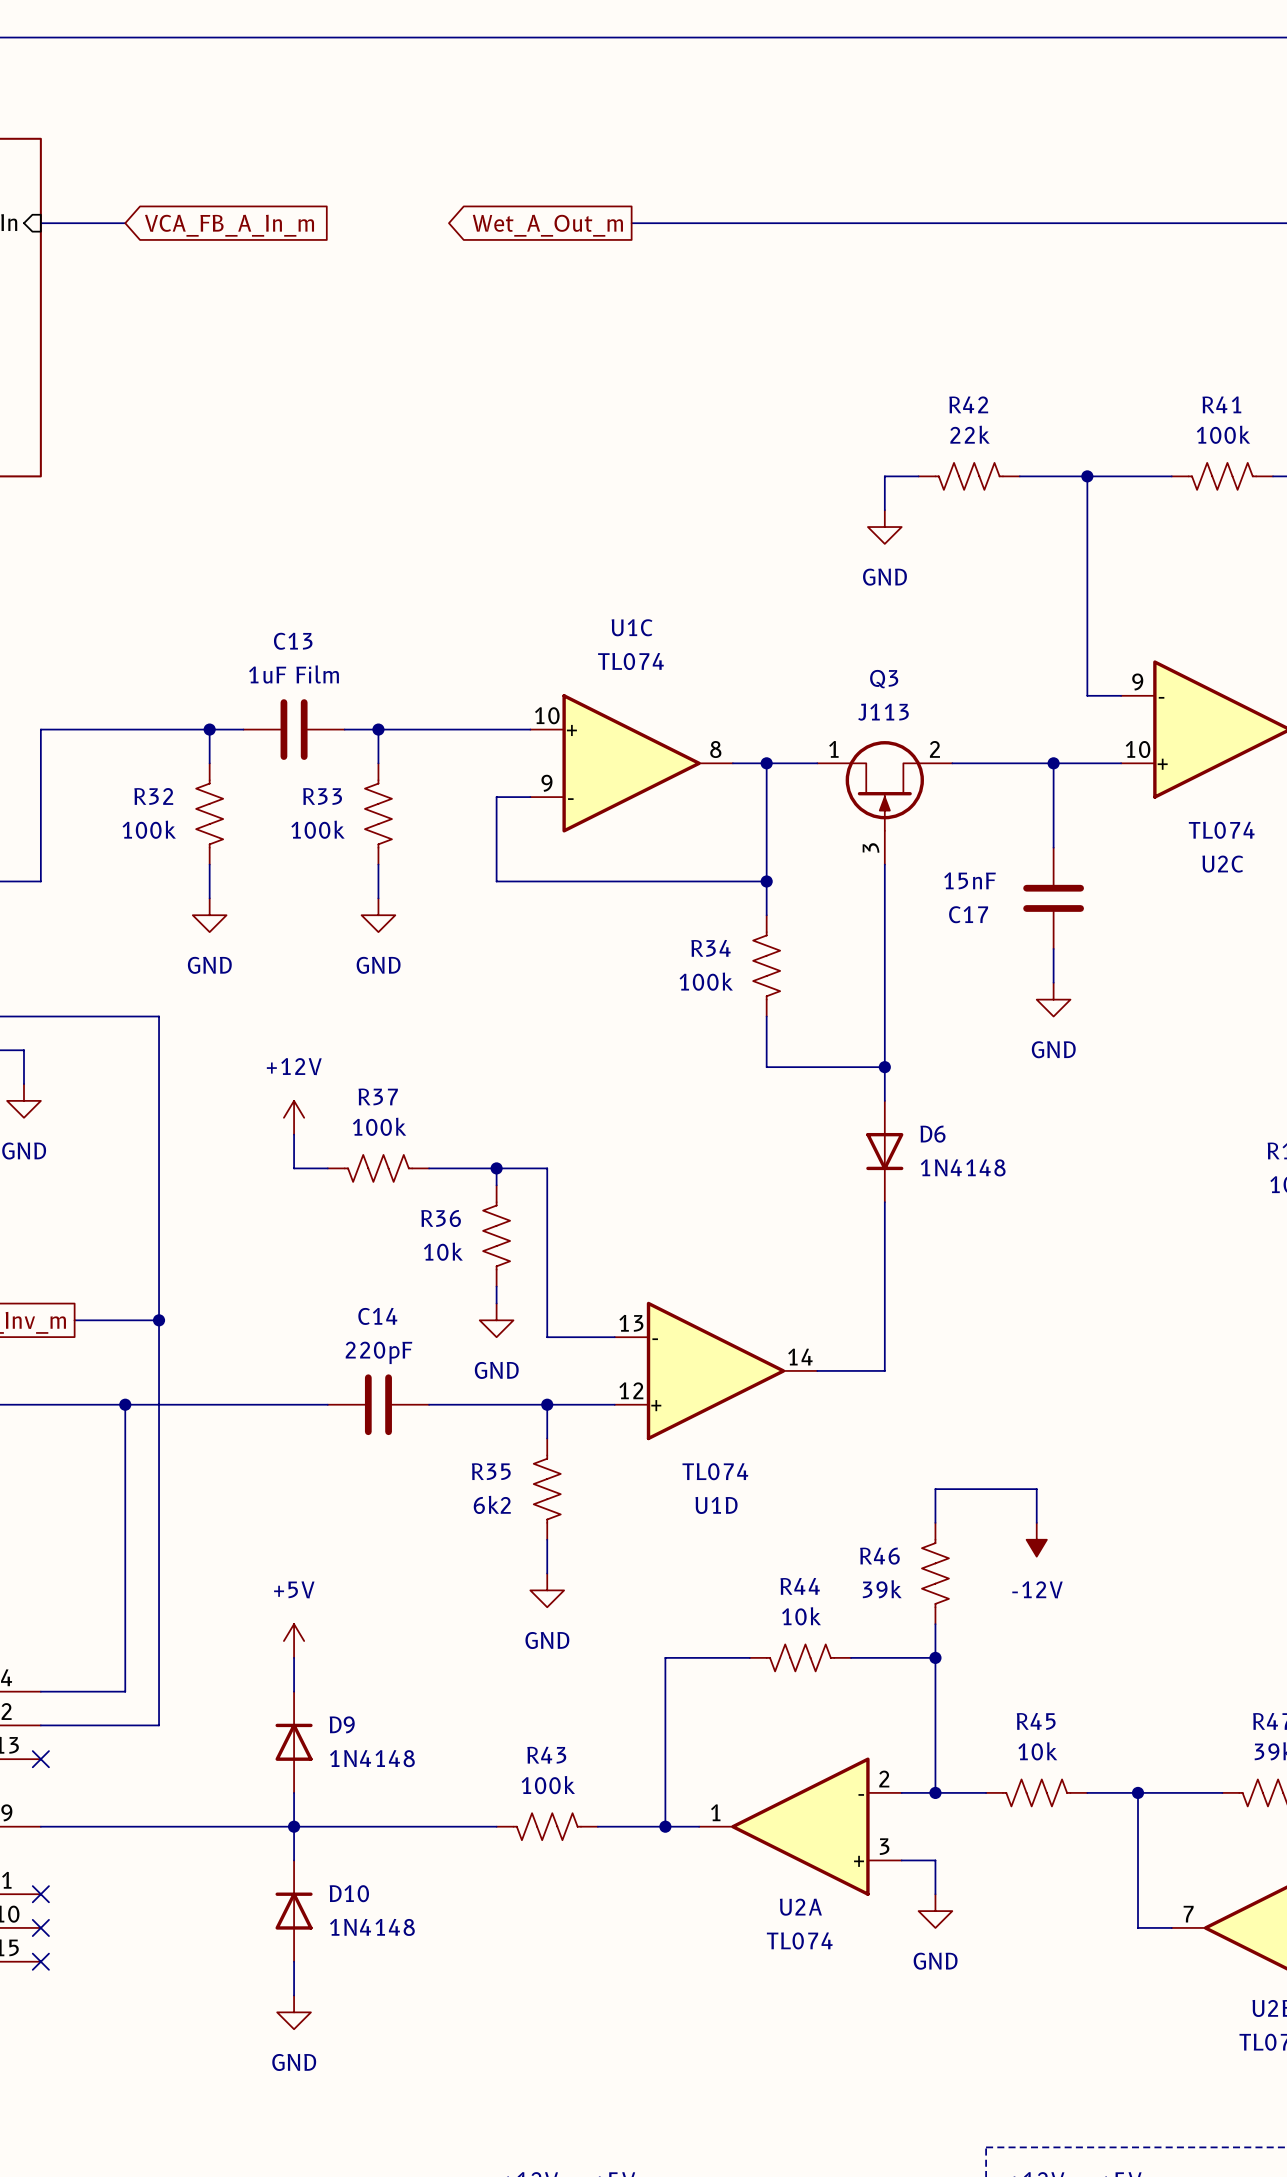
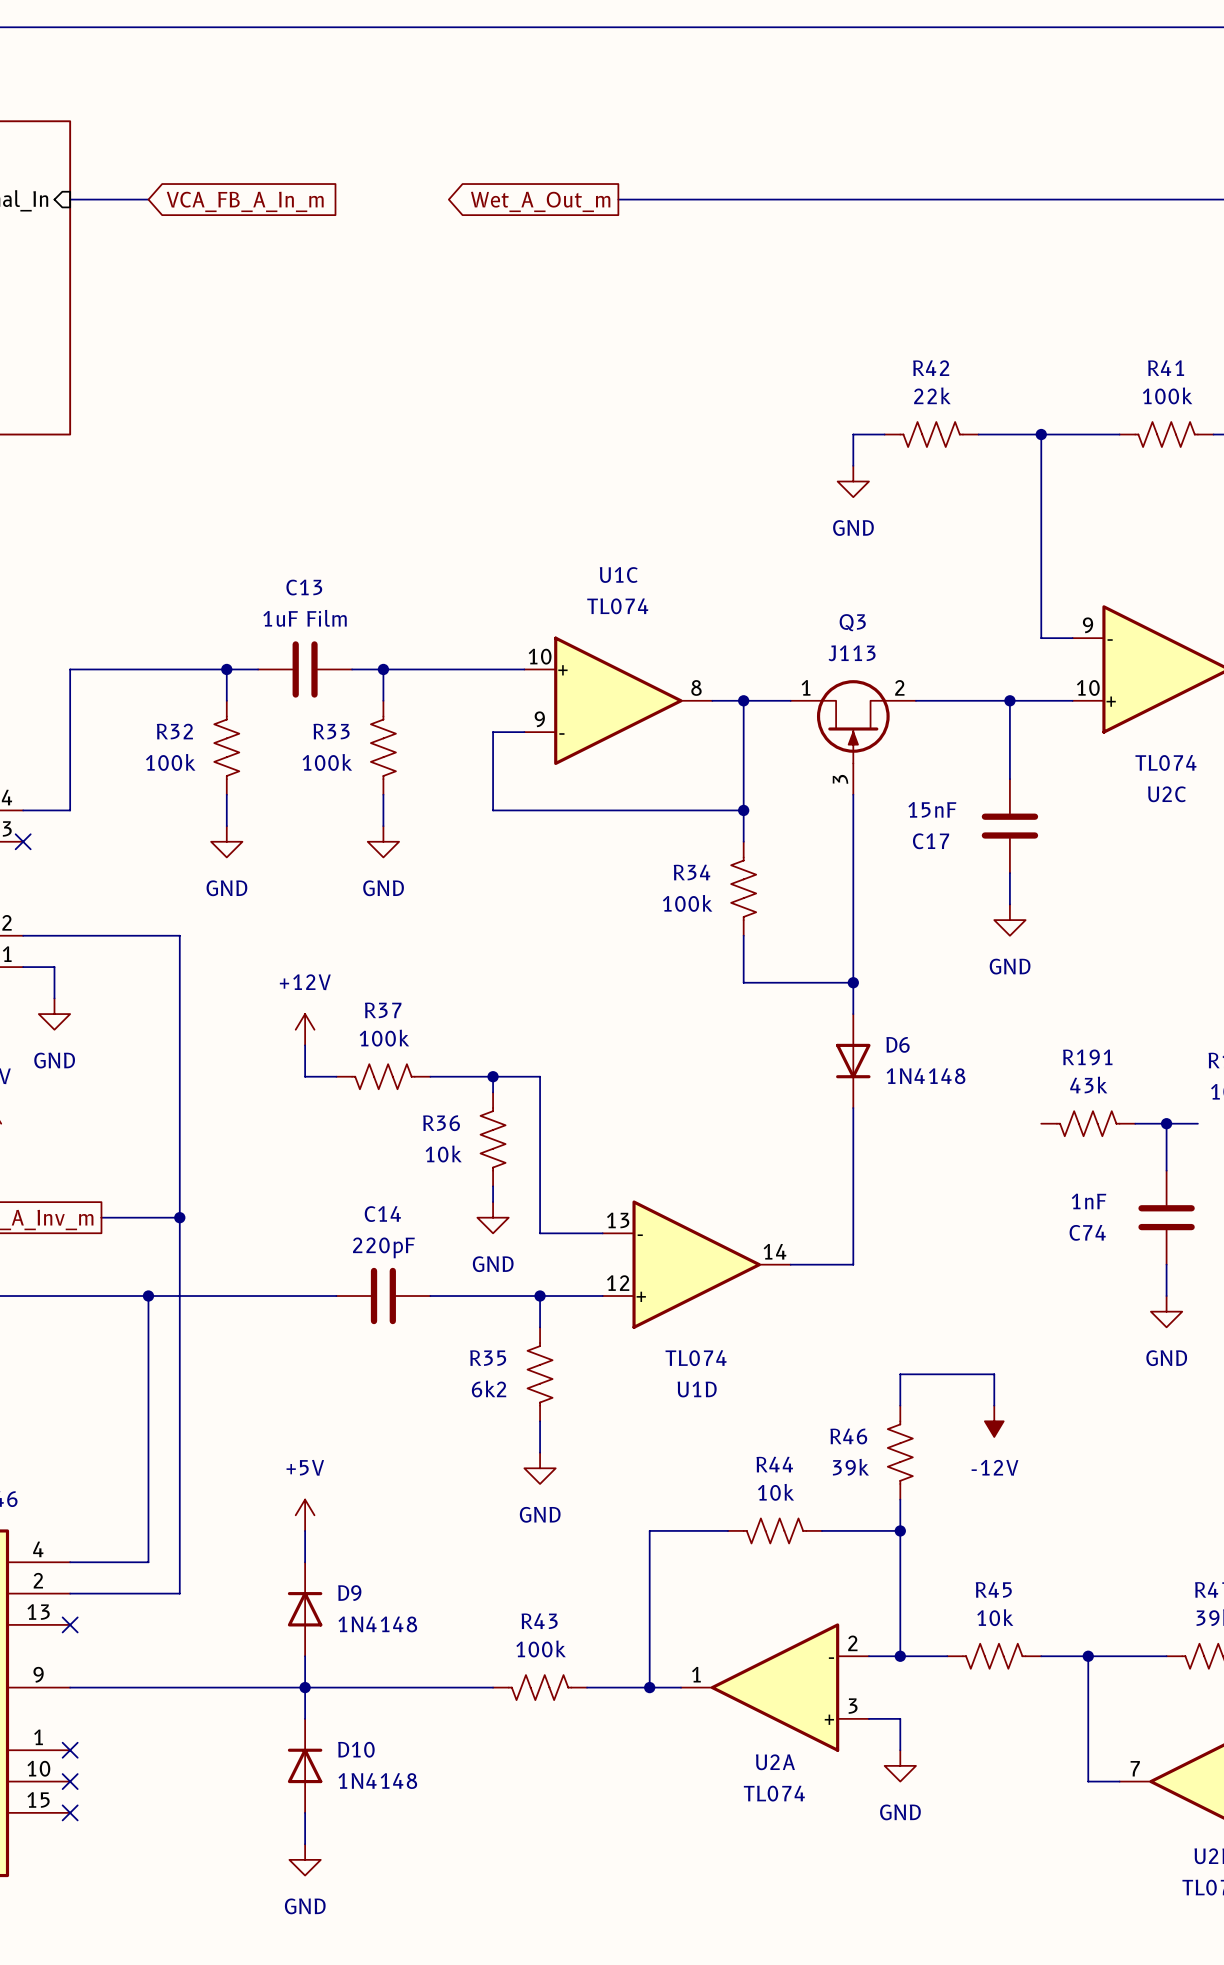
R191: none -> 43k (1088, 1123)
wire: none -> (1135, 1123) (1197, 1123)
wire: none -> (1166, 1123) (1166, 1170)
junction: none -> (1166, 1123)
C74: none -> 1nF (1166, 1217)
wire: none -> (1166, 1264) (1166, 1296)
power symbol: none -> GND (1166, 1311)

